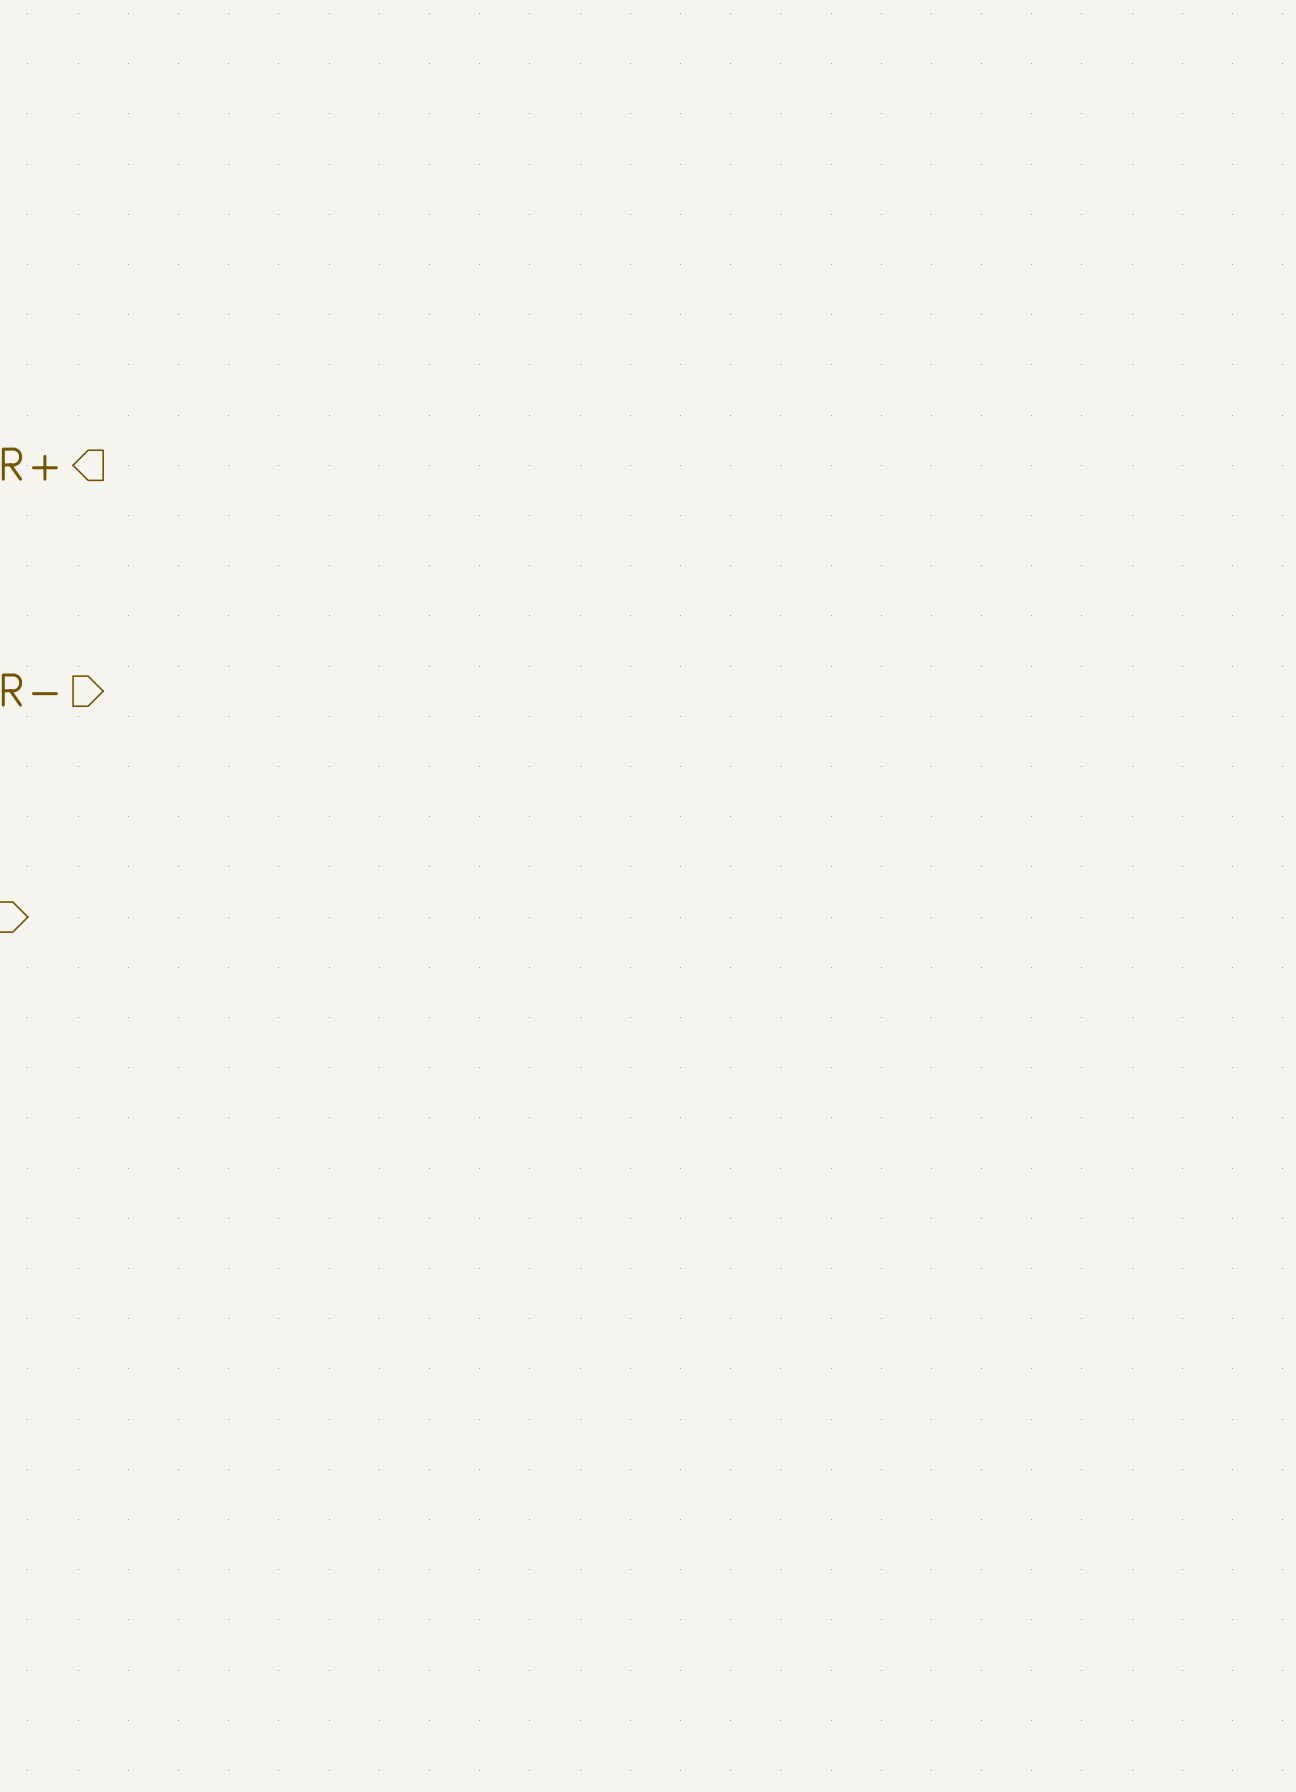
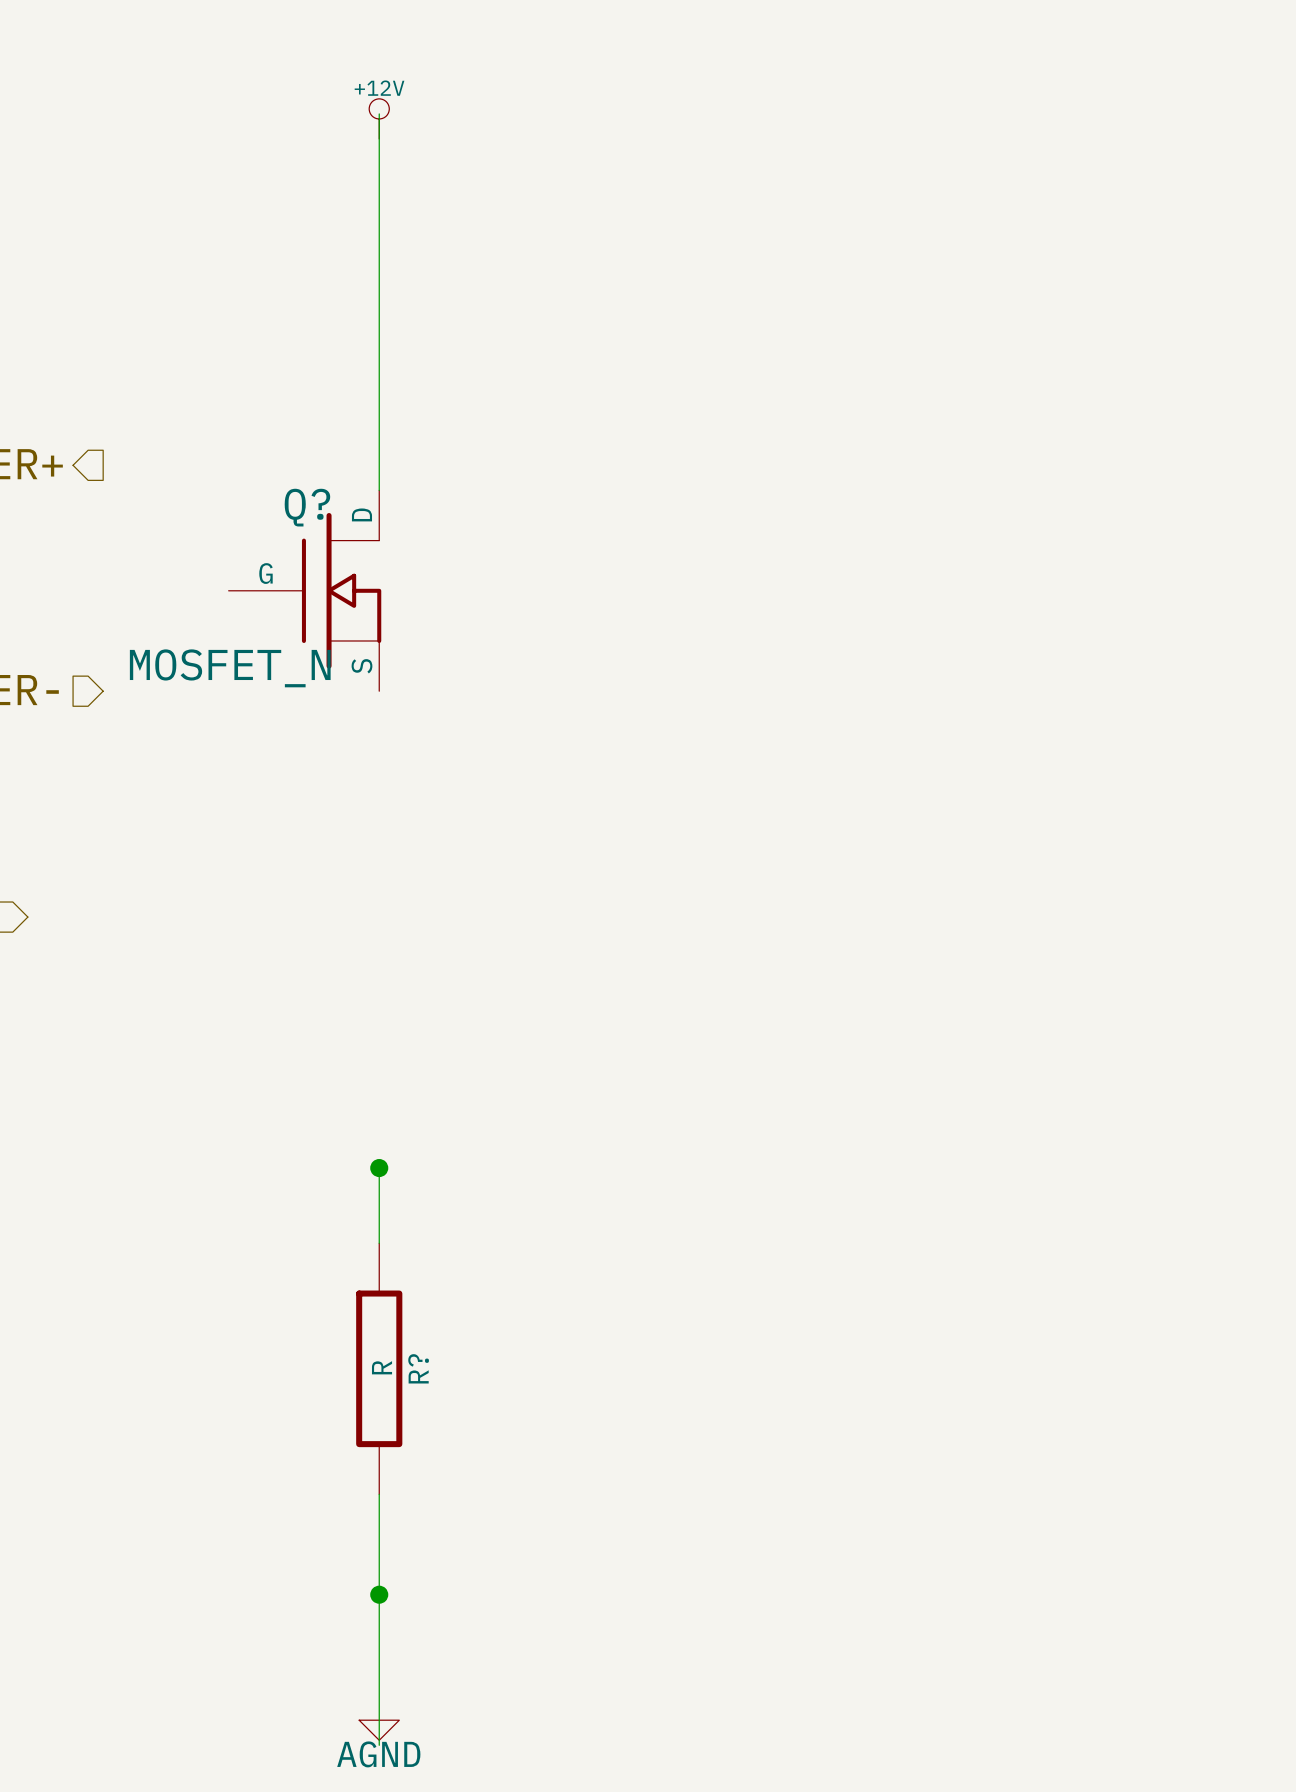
wire: none -> (379, 113) (379, 490)
power symbol: none -> +12V (379, 118)
Q?: none -> MOSFET_N (304, 590)
wire: none -> (379, 1168) (379, 1243)
junction: none -> (379, 1168)
R?: none -> R (379, 1368)
wire: none -> (379, 1494) (379, 1745)
junction: none -> (379, 1594)
power symbol: none -> AGND (379, 1730)

